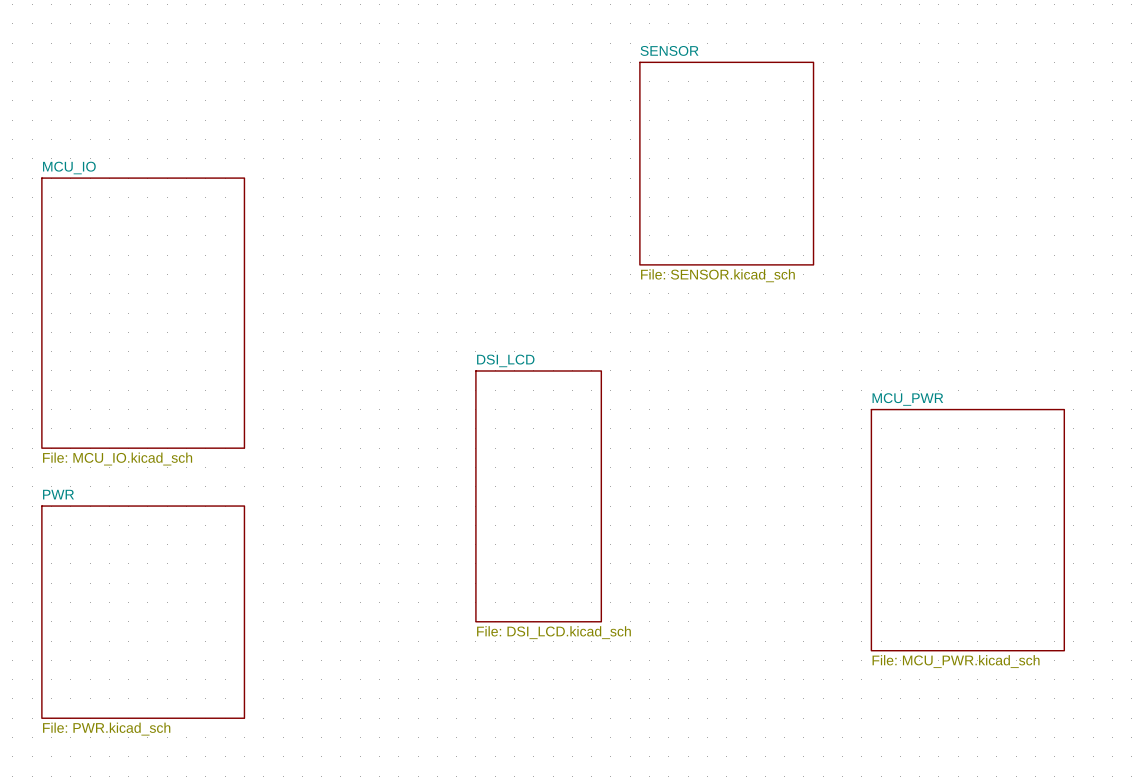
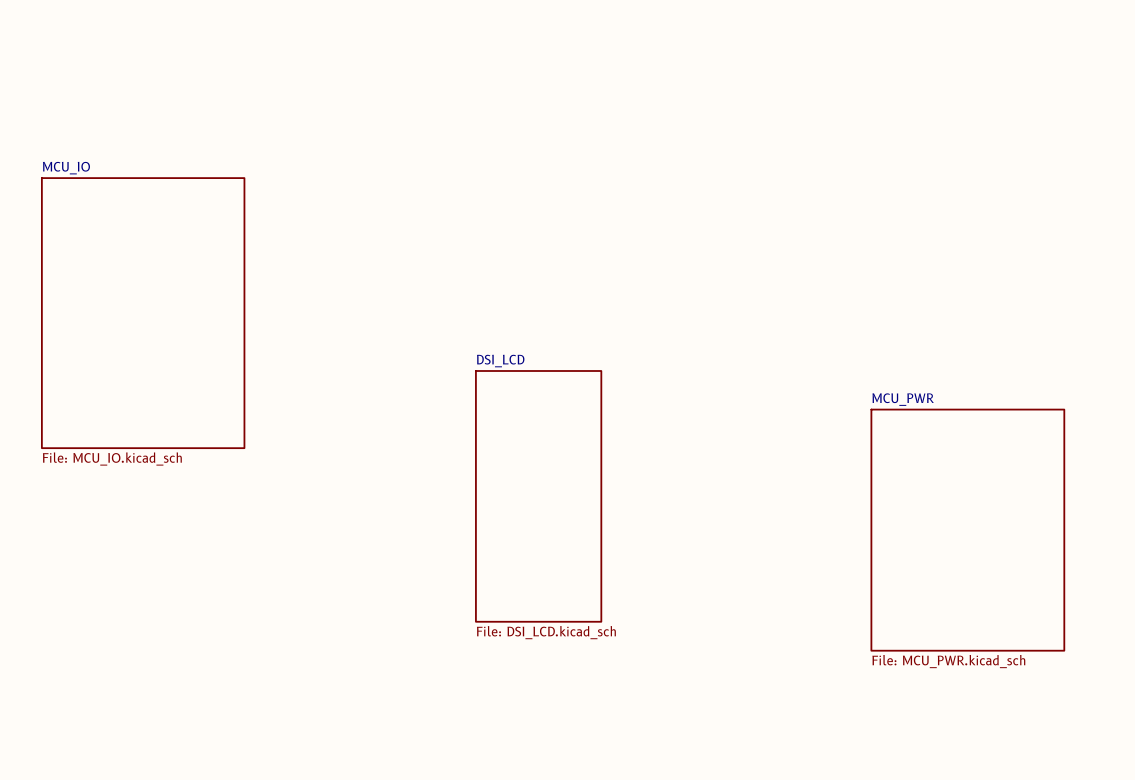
sheet SENSOR: File: SENSOR.kicad_sch (726, 163) -> none
sheet PWR: File: PWR.kicad_sch (143, 612) -> none

